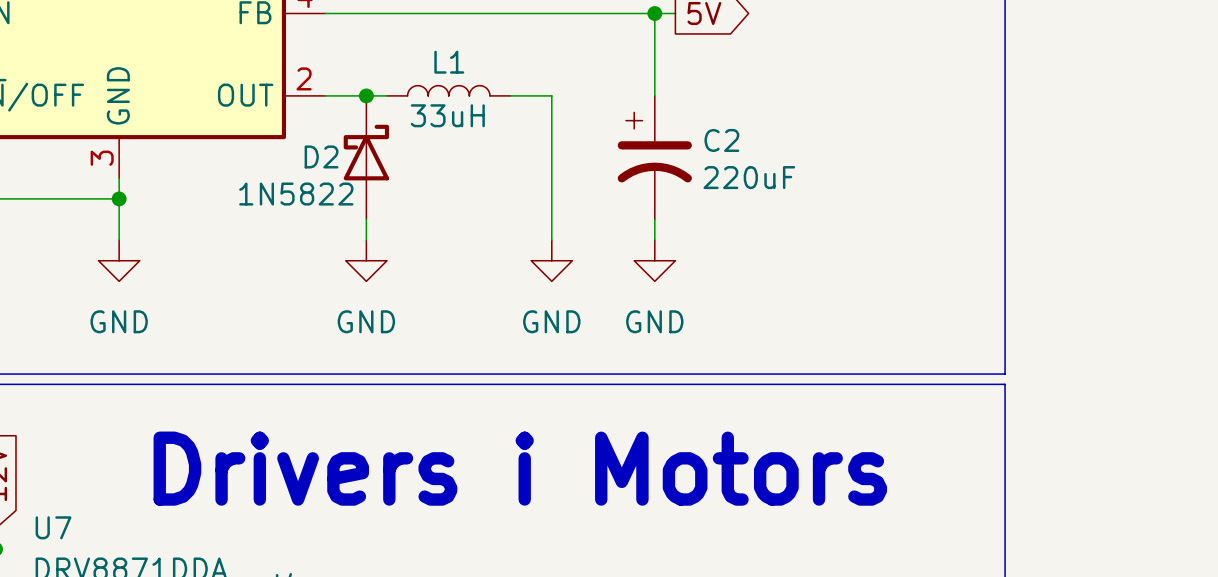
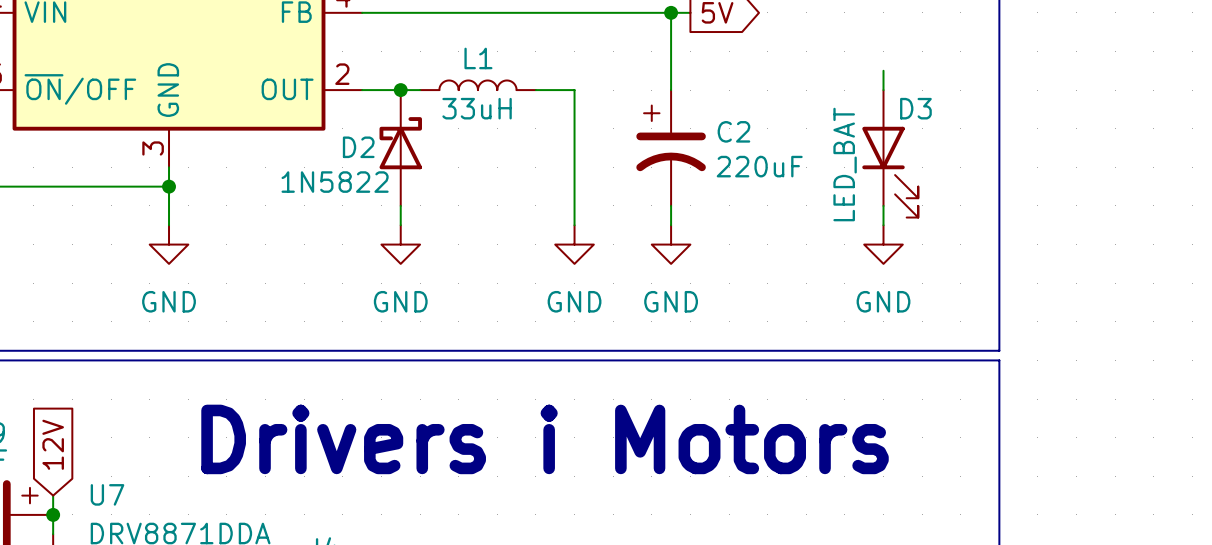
wire: none -> (883, 70) (883, 90)
D3: none -> LED_BAT (890, 153)
wire: none -> (883, 205) (883, 225)
power symbol: none -> GND (883, 244)

